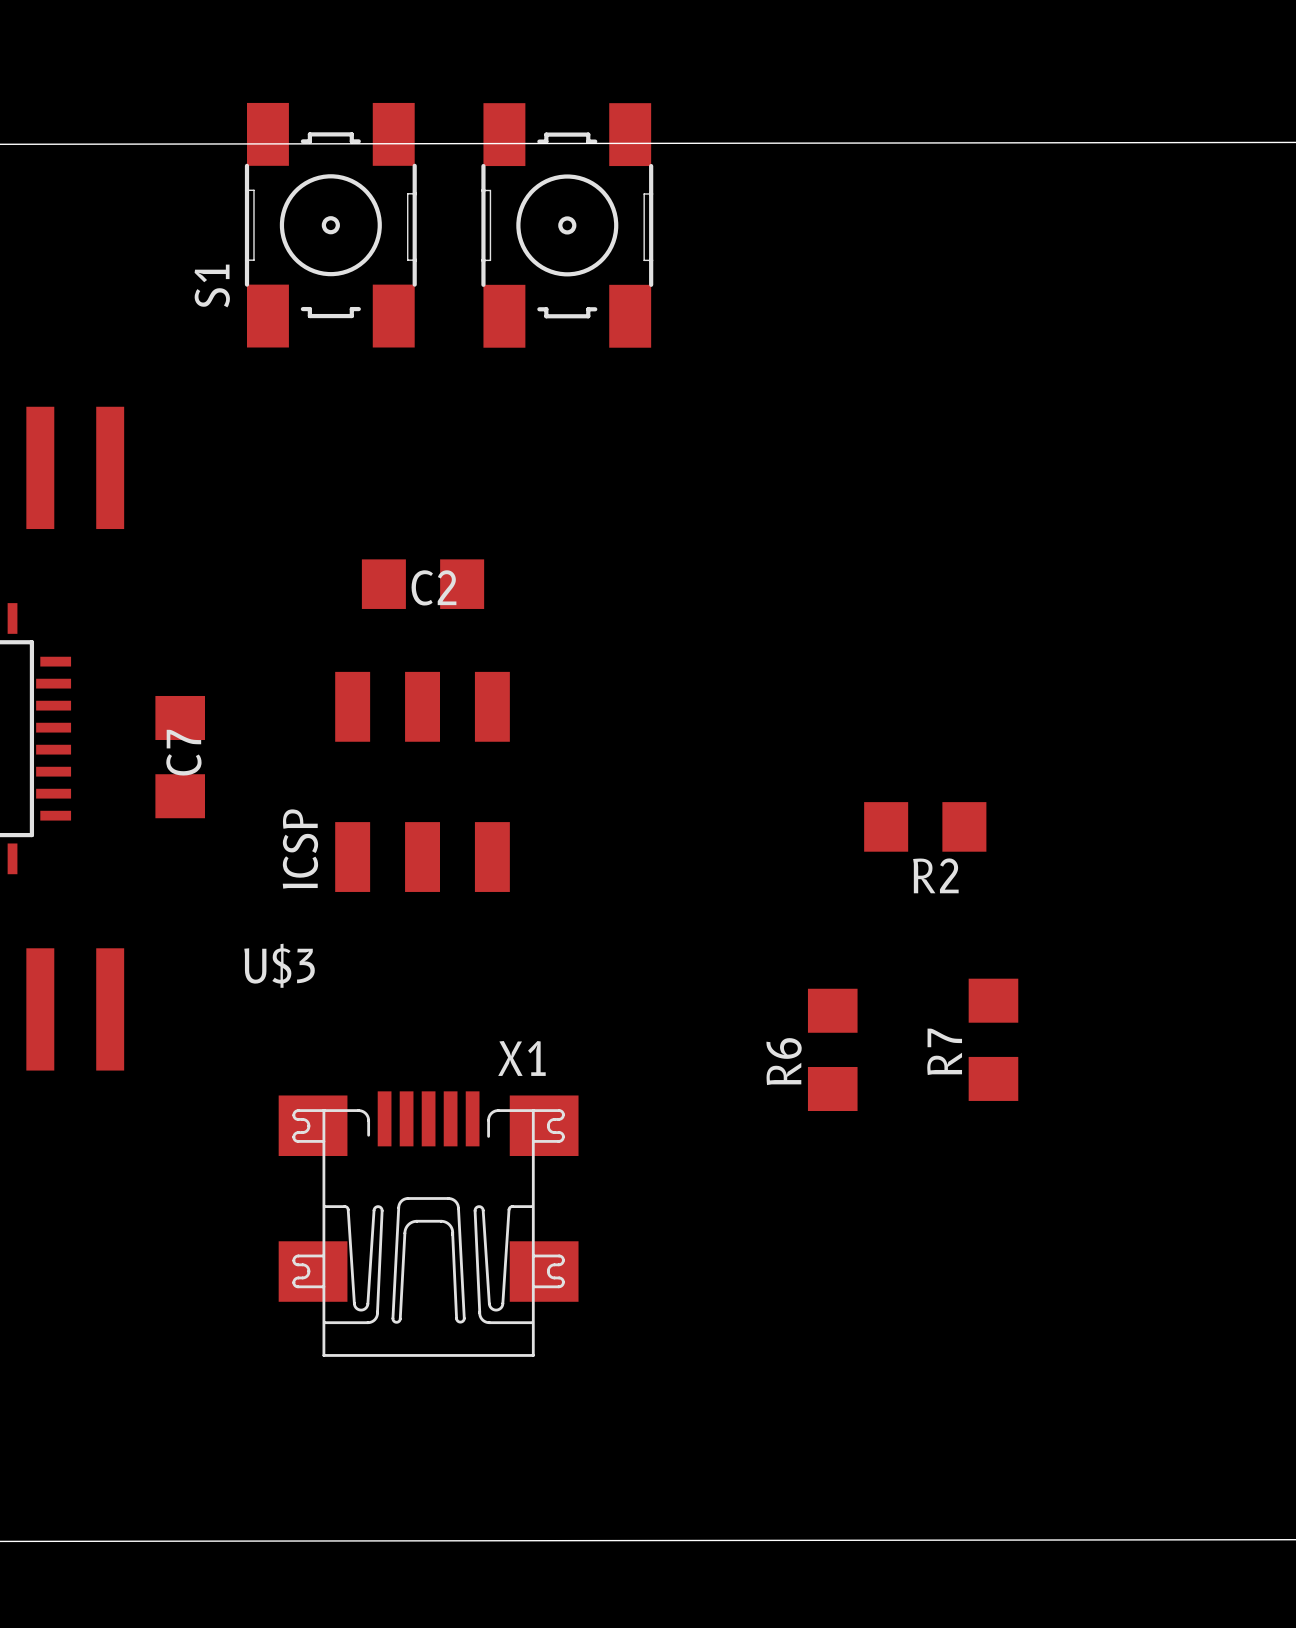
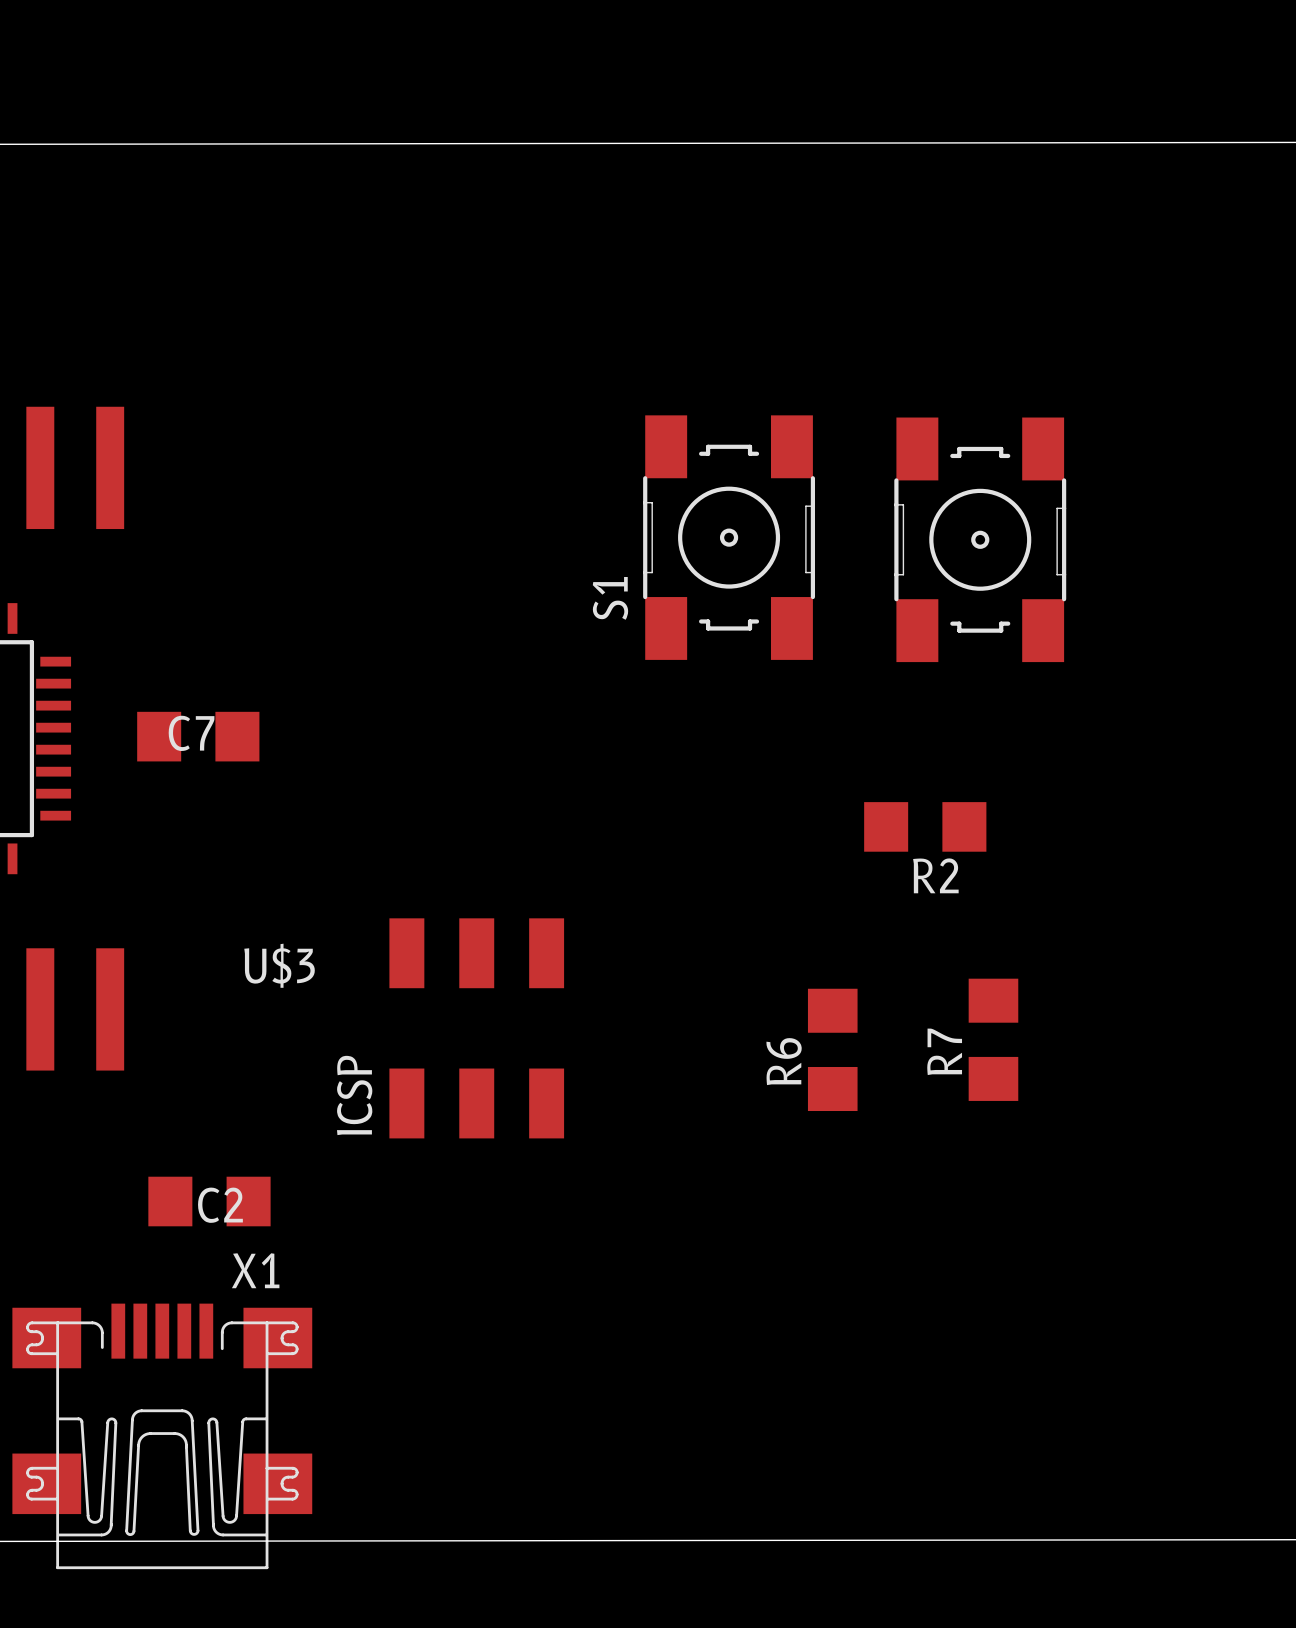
S1 position: (330, 225) -> (729, 537)
part position: (567, 225) -> (980, 539)
C2 position: (423, 584) -> (209, 1201)
C7 rotation: 0° (180, 757) -> 90° clockwise (198, 736)
ICSP position: (422, 781) -> (476, 1028)
X1 position: (428, 1224) -> (162, 1436)

